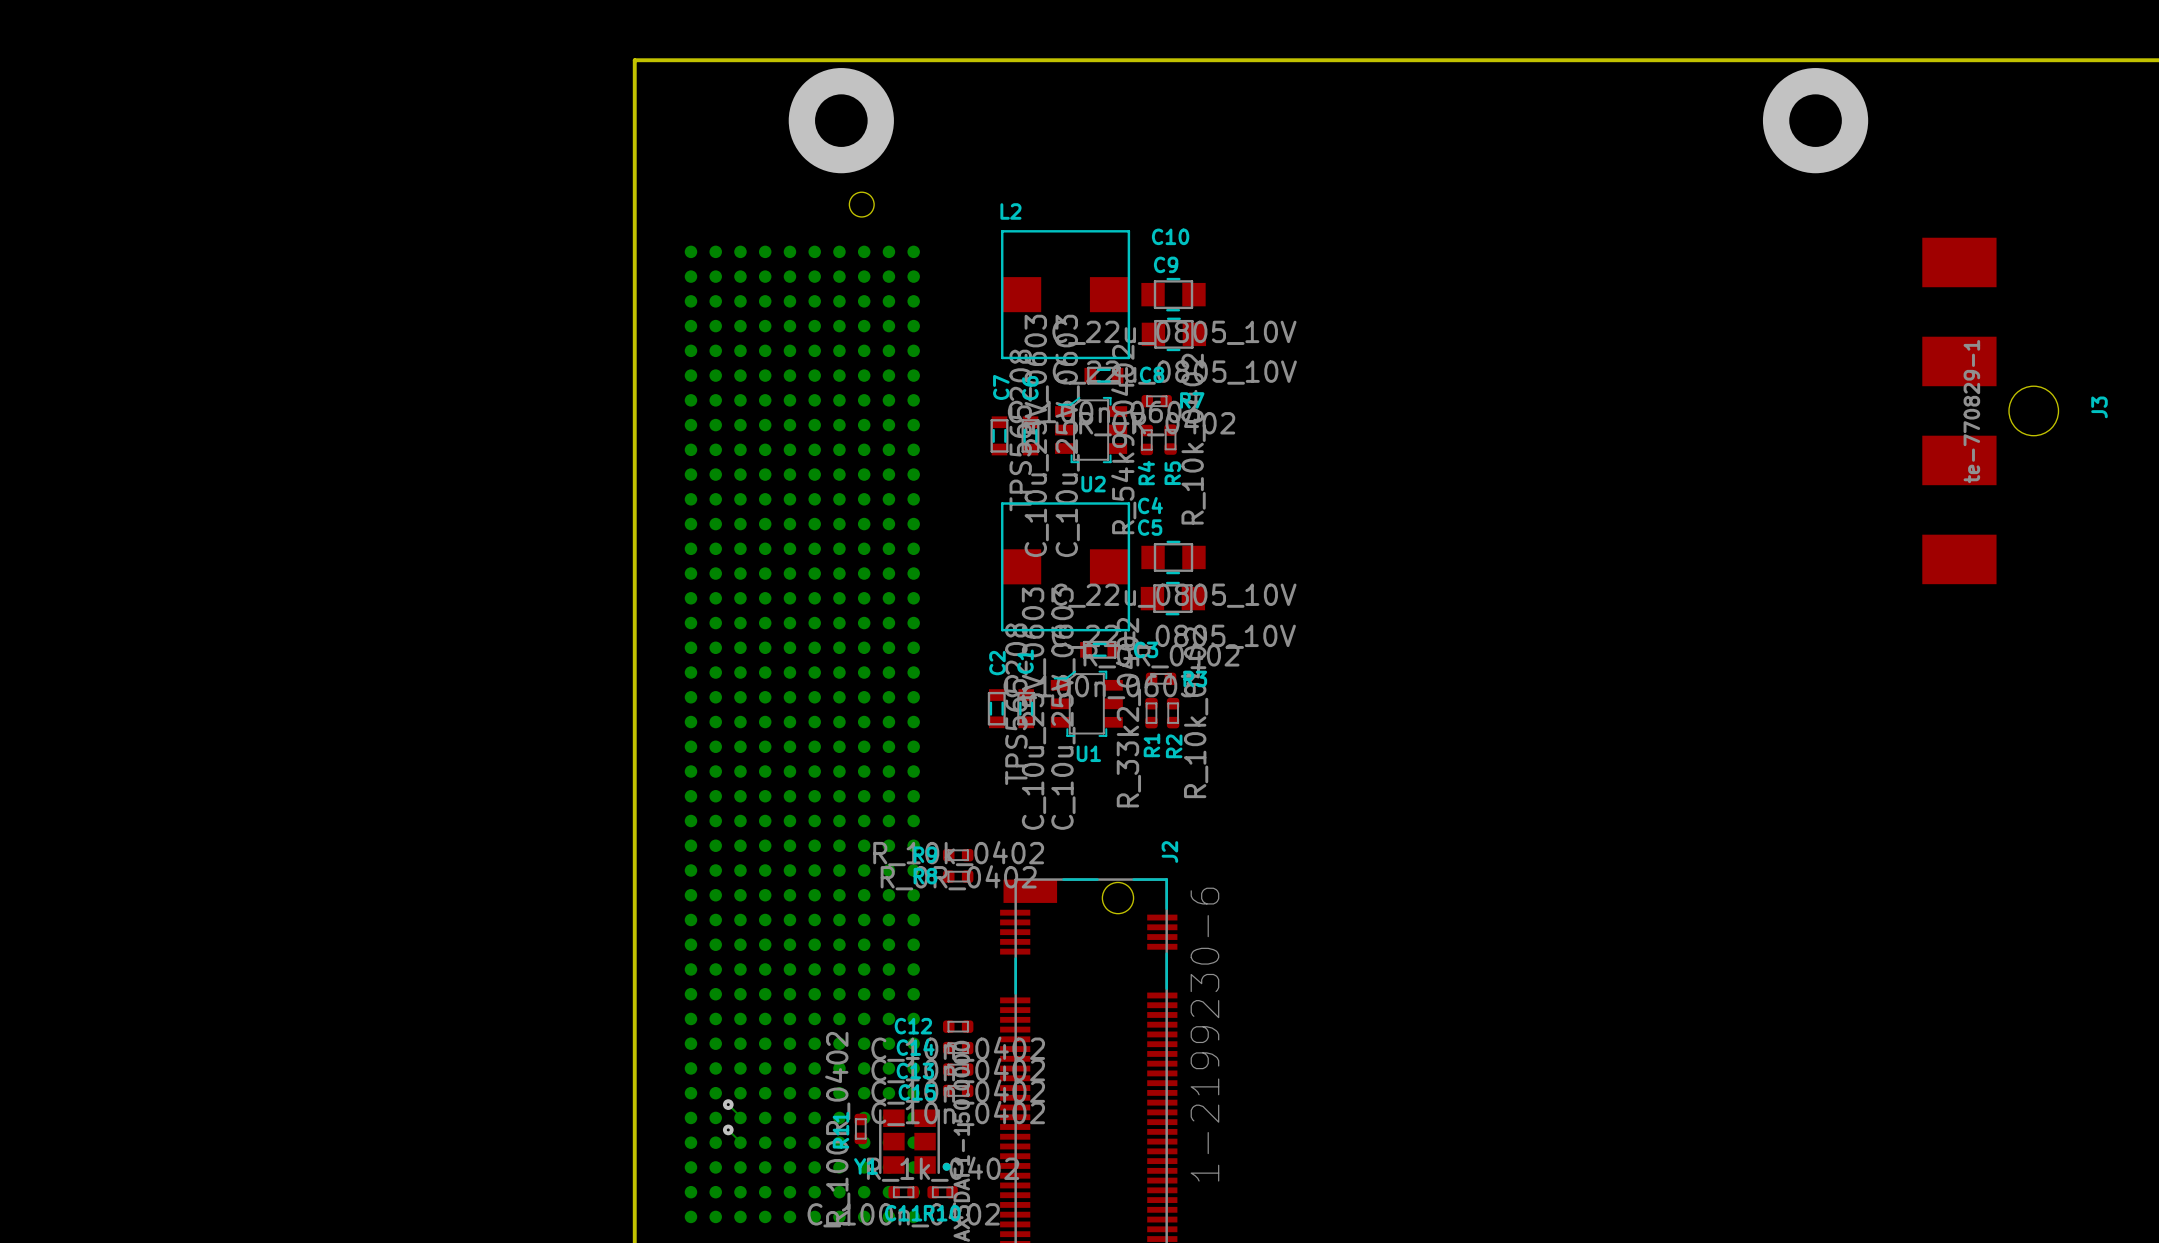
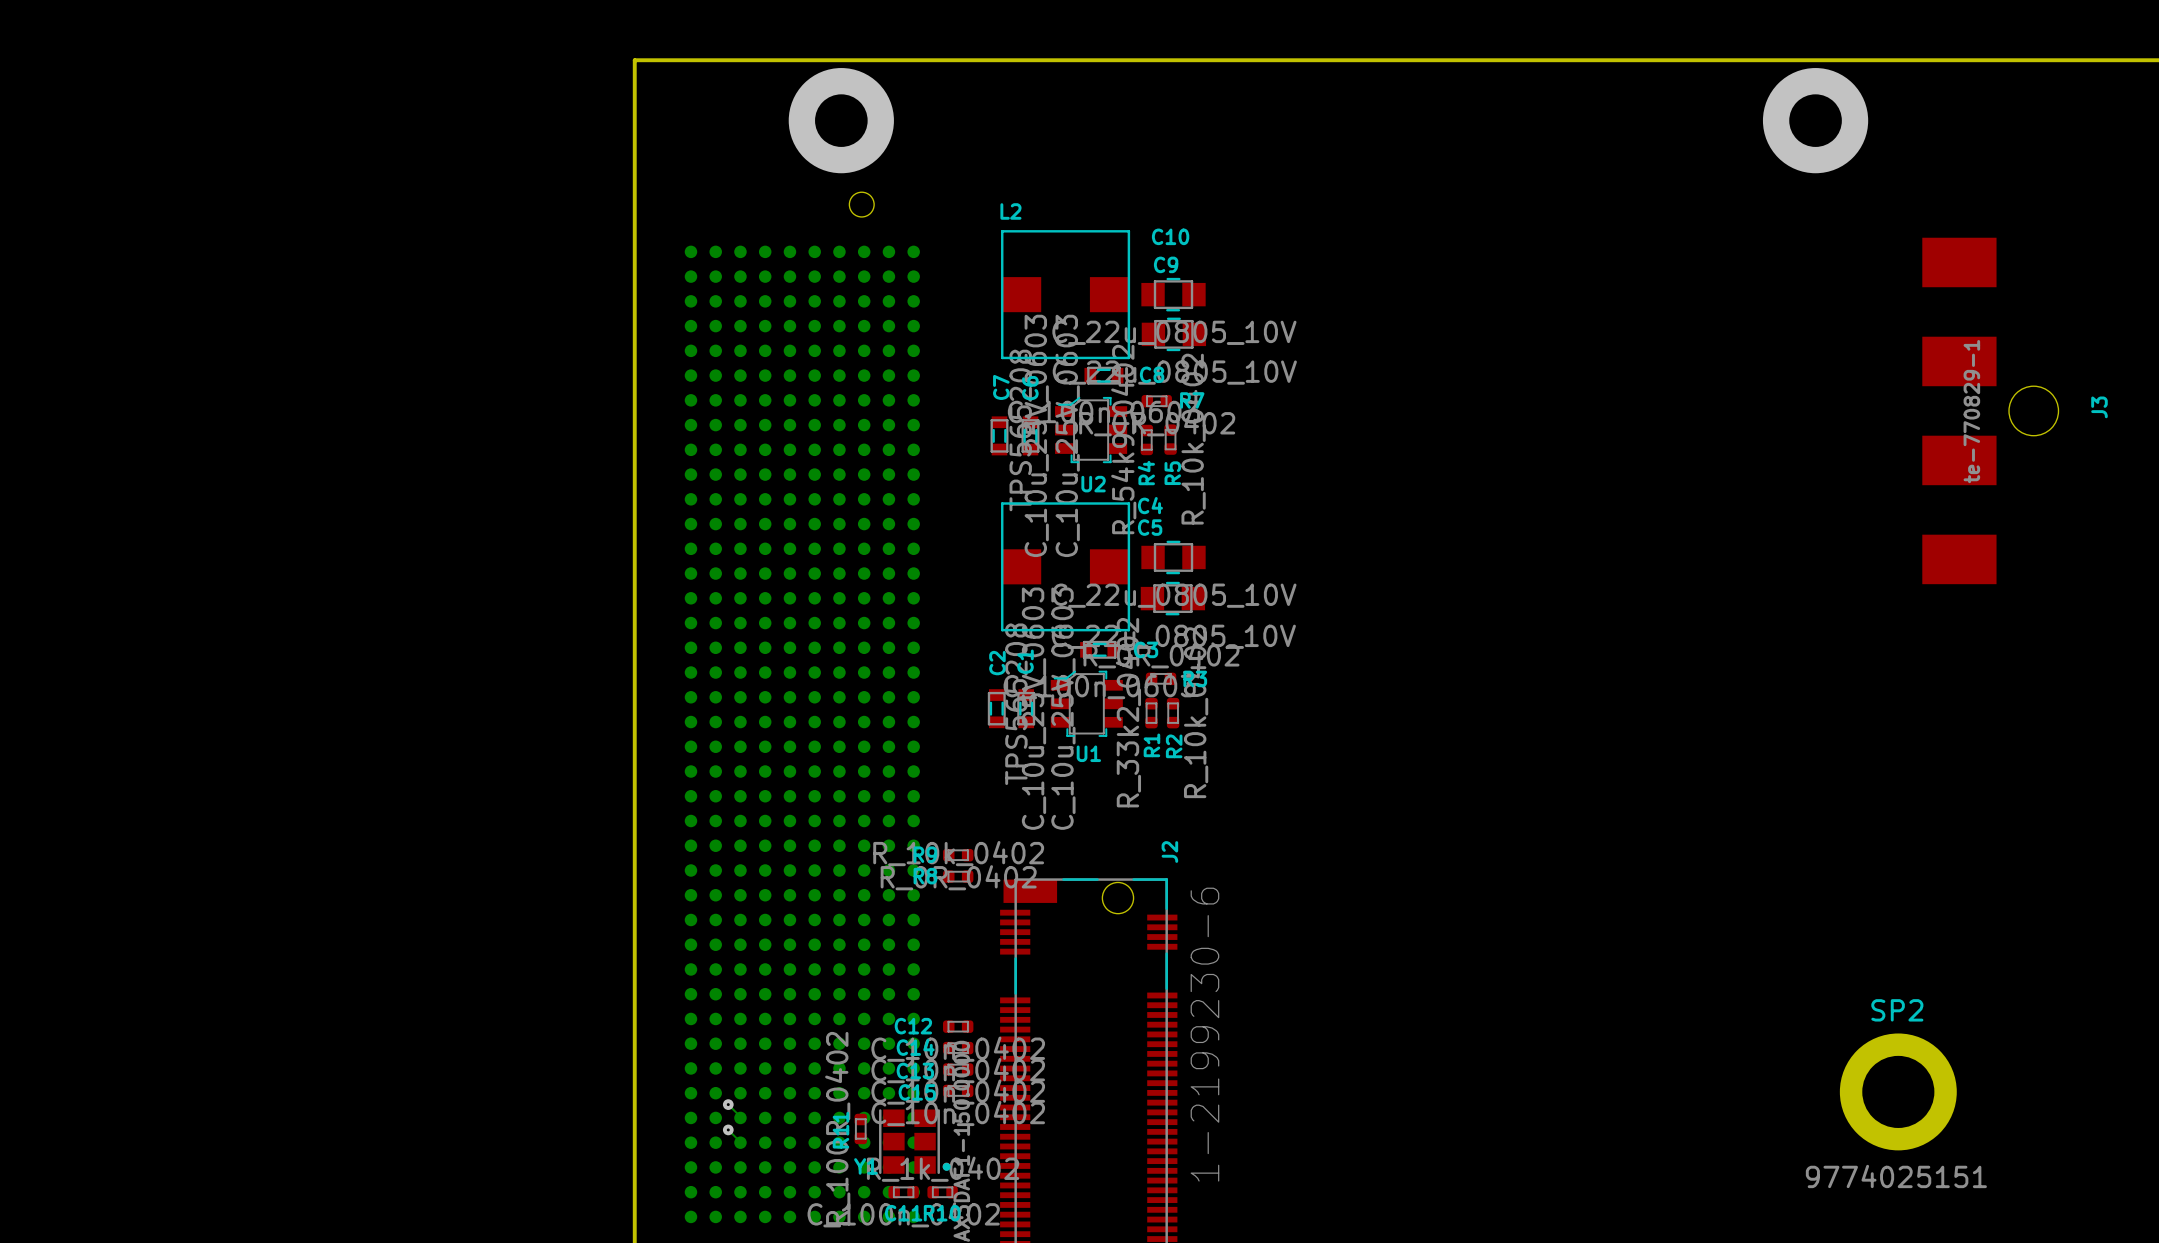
SP2: none -> 9774025151 (1898, 1091)

